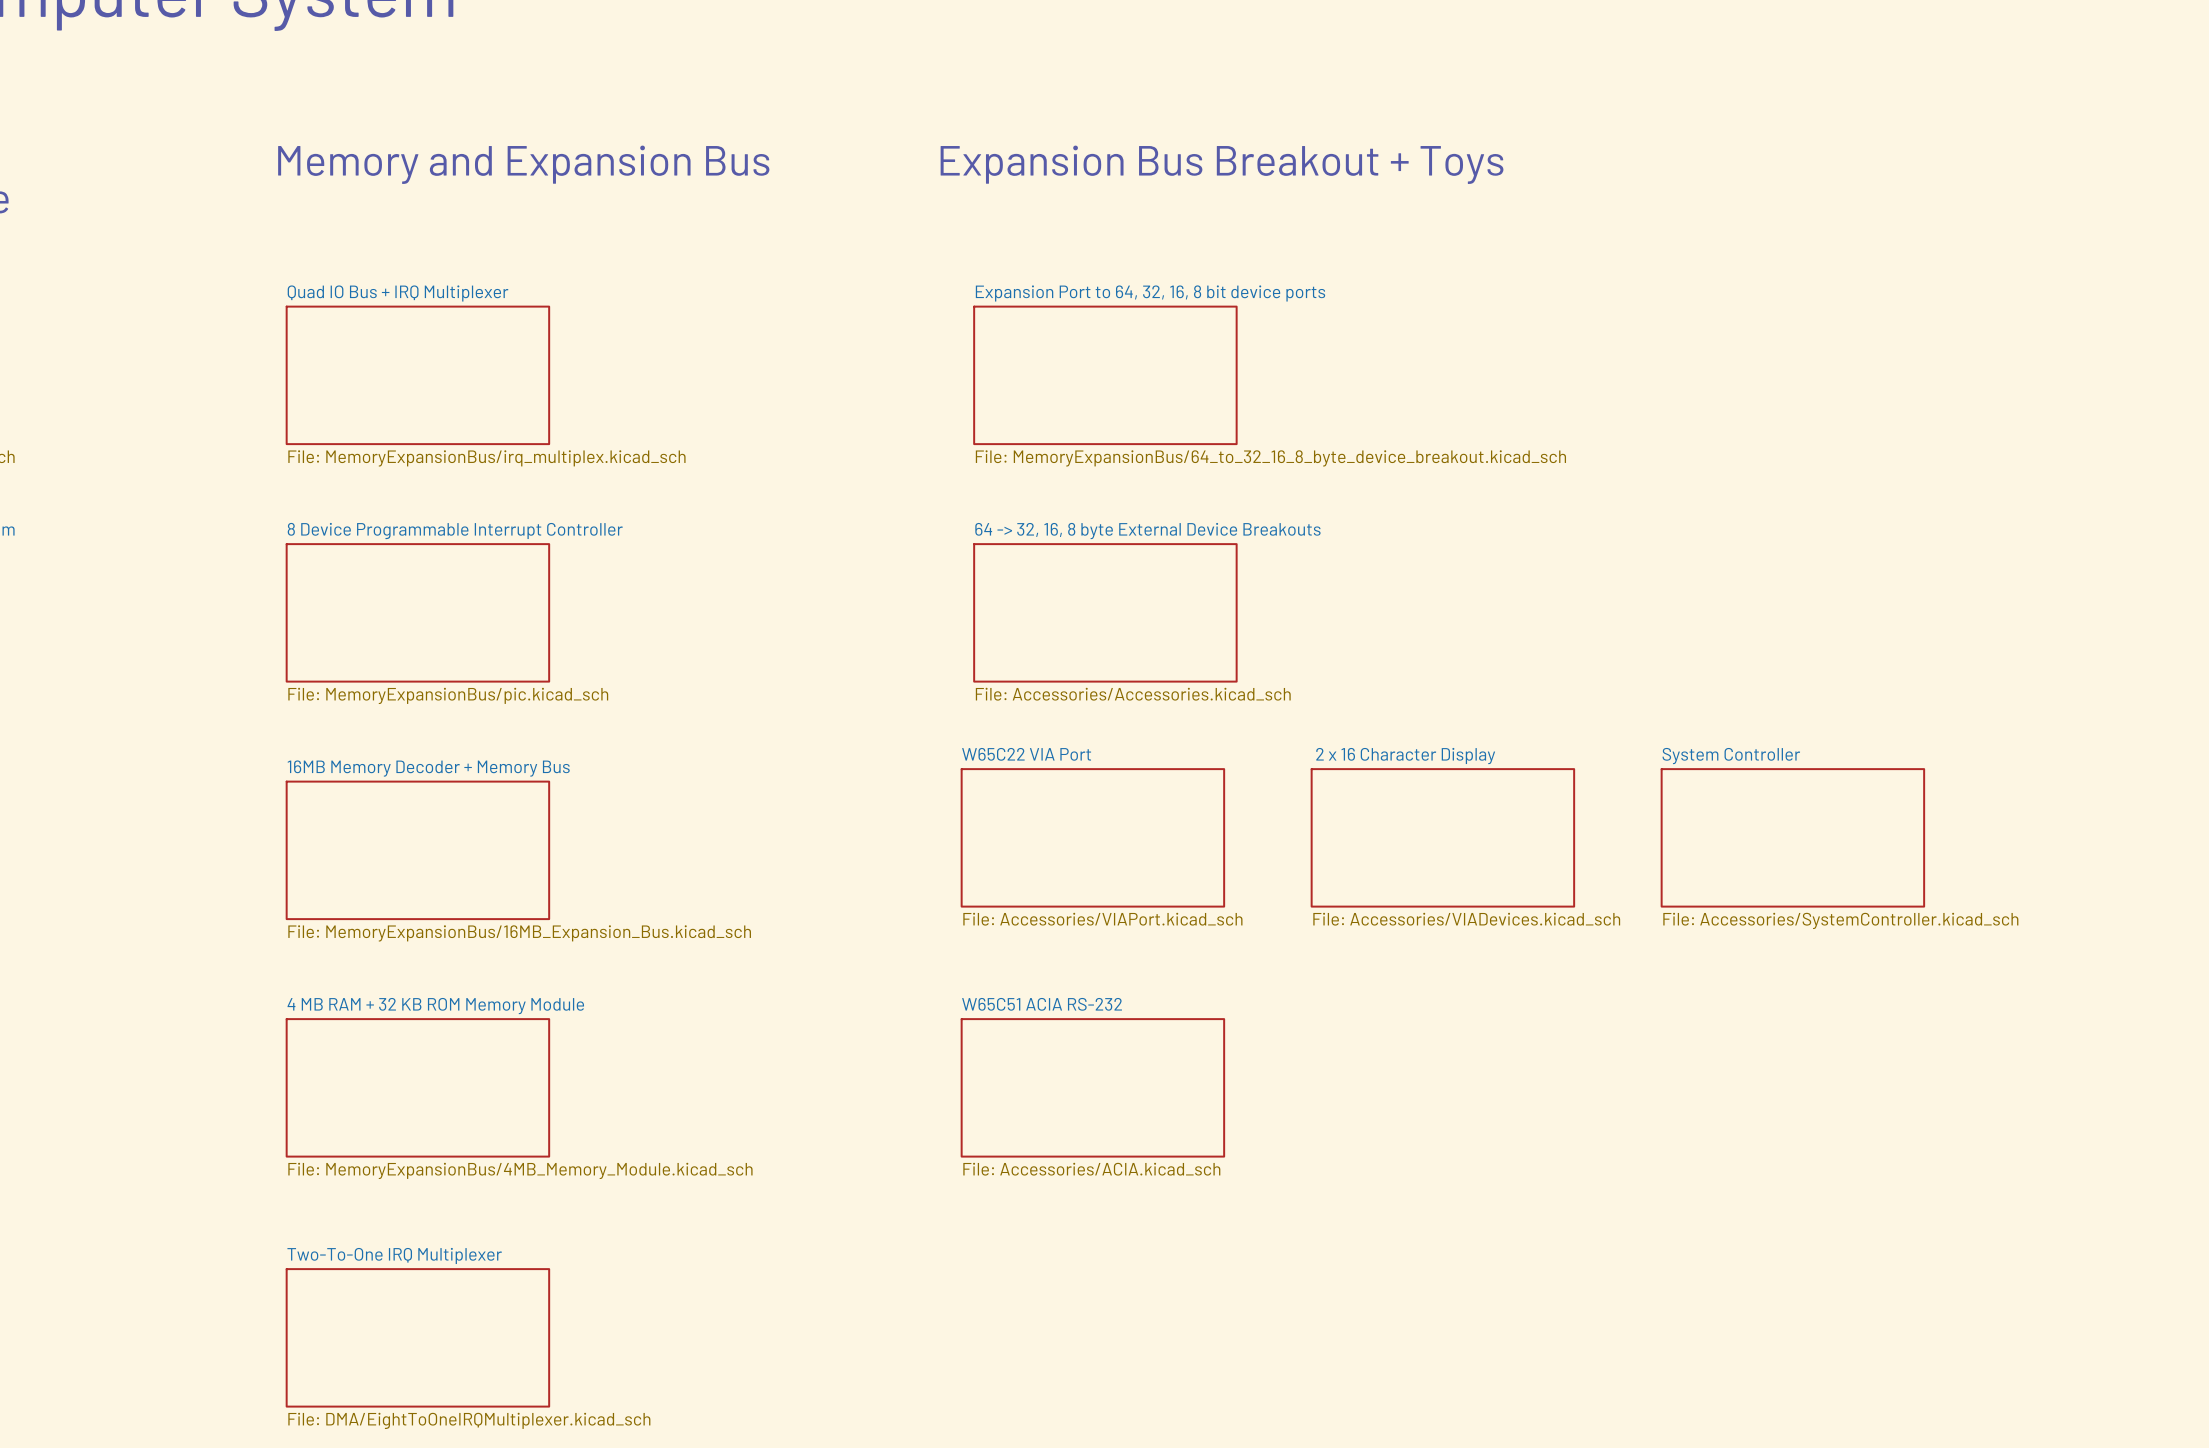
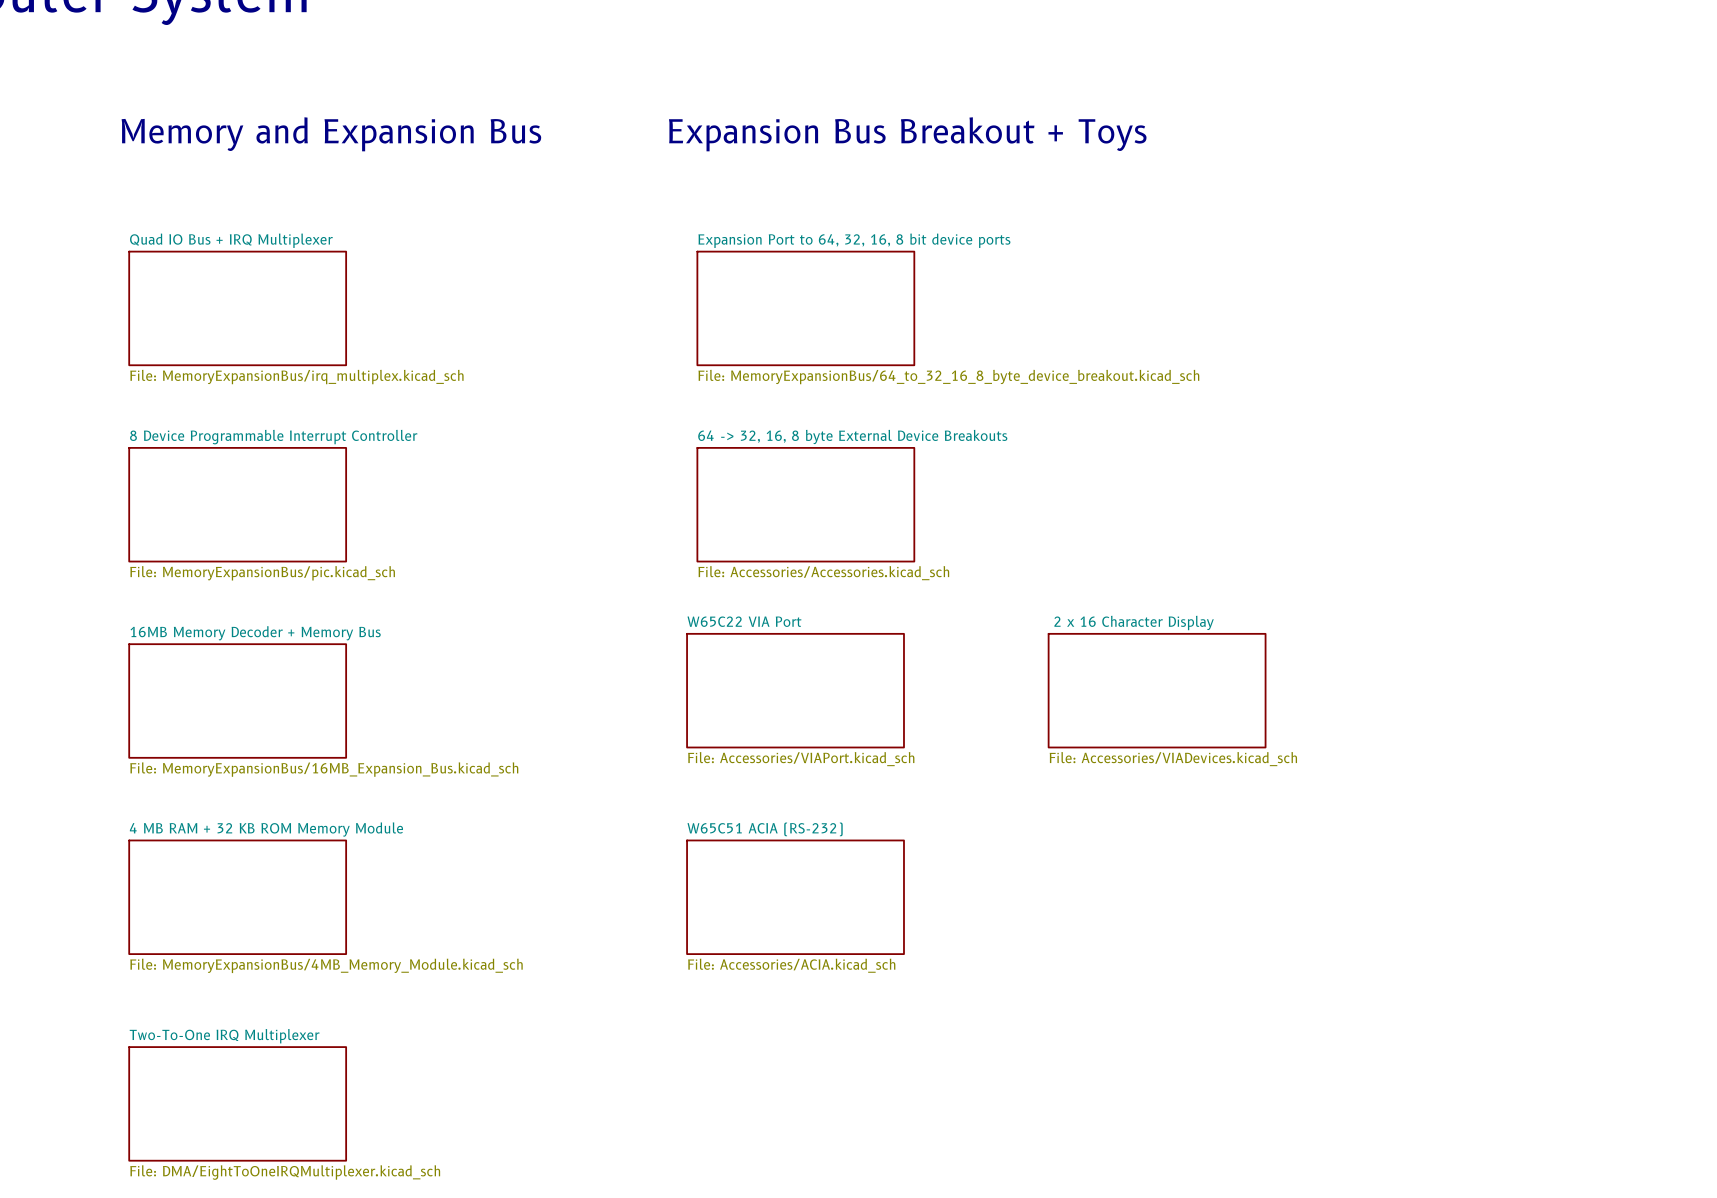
sheet 2 x 16 Character Display position: (1442, 837) -> (1157, 690)
sheet System Controller: File: Accessories/SystemController.kicad_sch (1792, 837) -> none
sheet W65C51 ACIA RS-232 name: W65C51 ACIA RS-232 (1042, 1004) -> W65C51 ACIA (RS-232) (765, 829)

